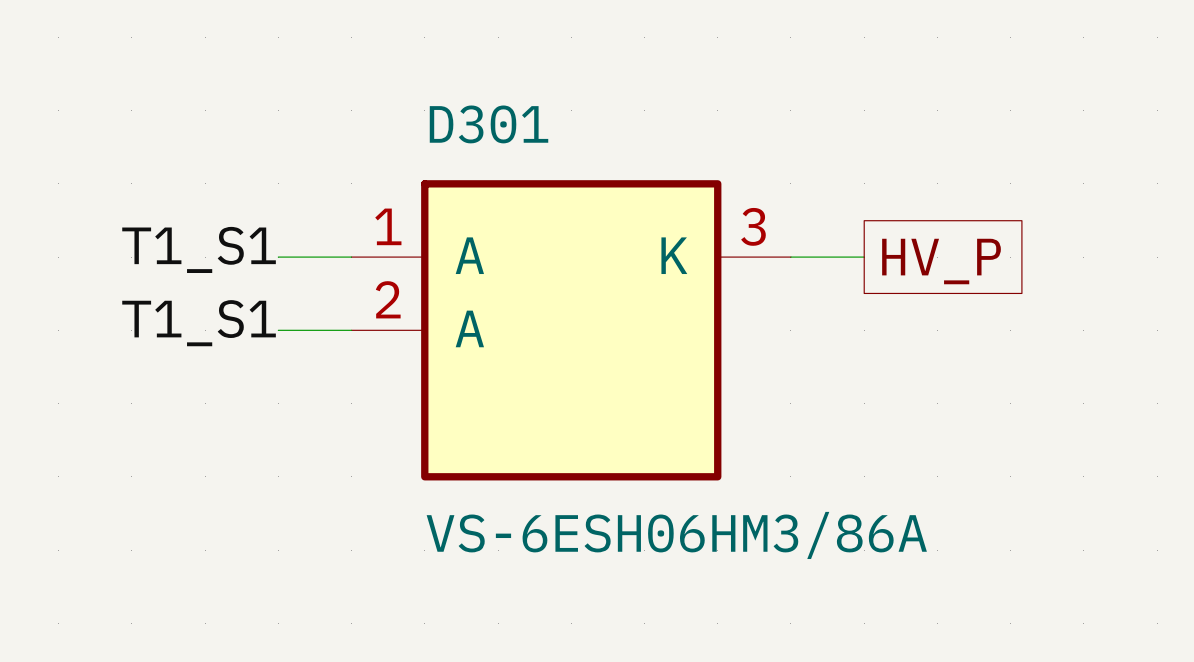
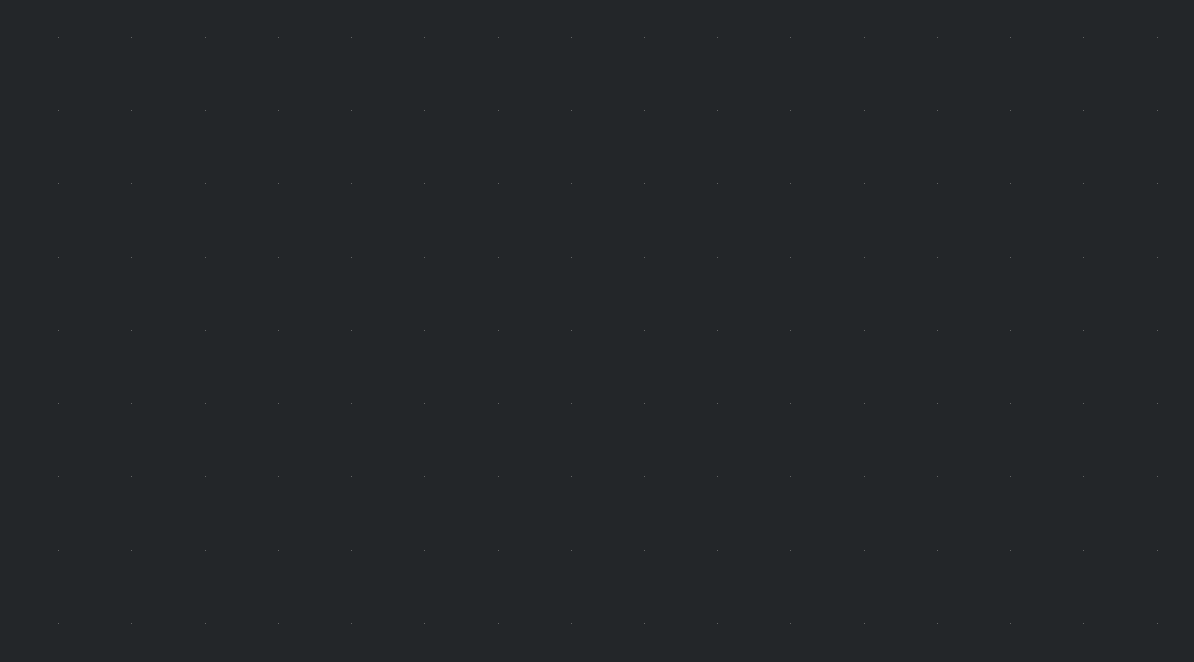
label: T1_S1 (199, 249) -> none
wire: (278, 257) (351, 257) -> none
wire: (790, 257) (864, 257) -> none
global label: HV_P (941, 261) -> none
label: T1_S1 (199, 323) -> none
wire: (278, 330) (351, 330) -> none
D301: VS-6ESH06HM3/86A (571, 330) -> none

